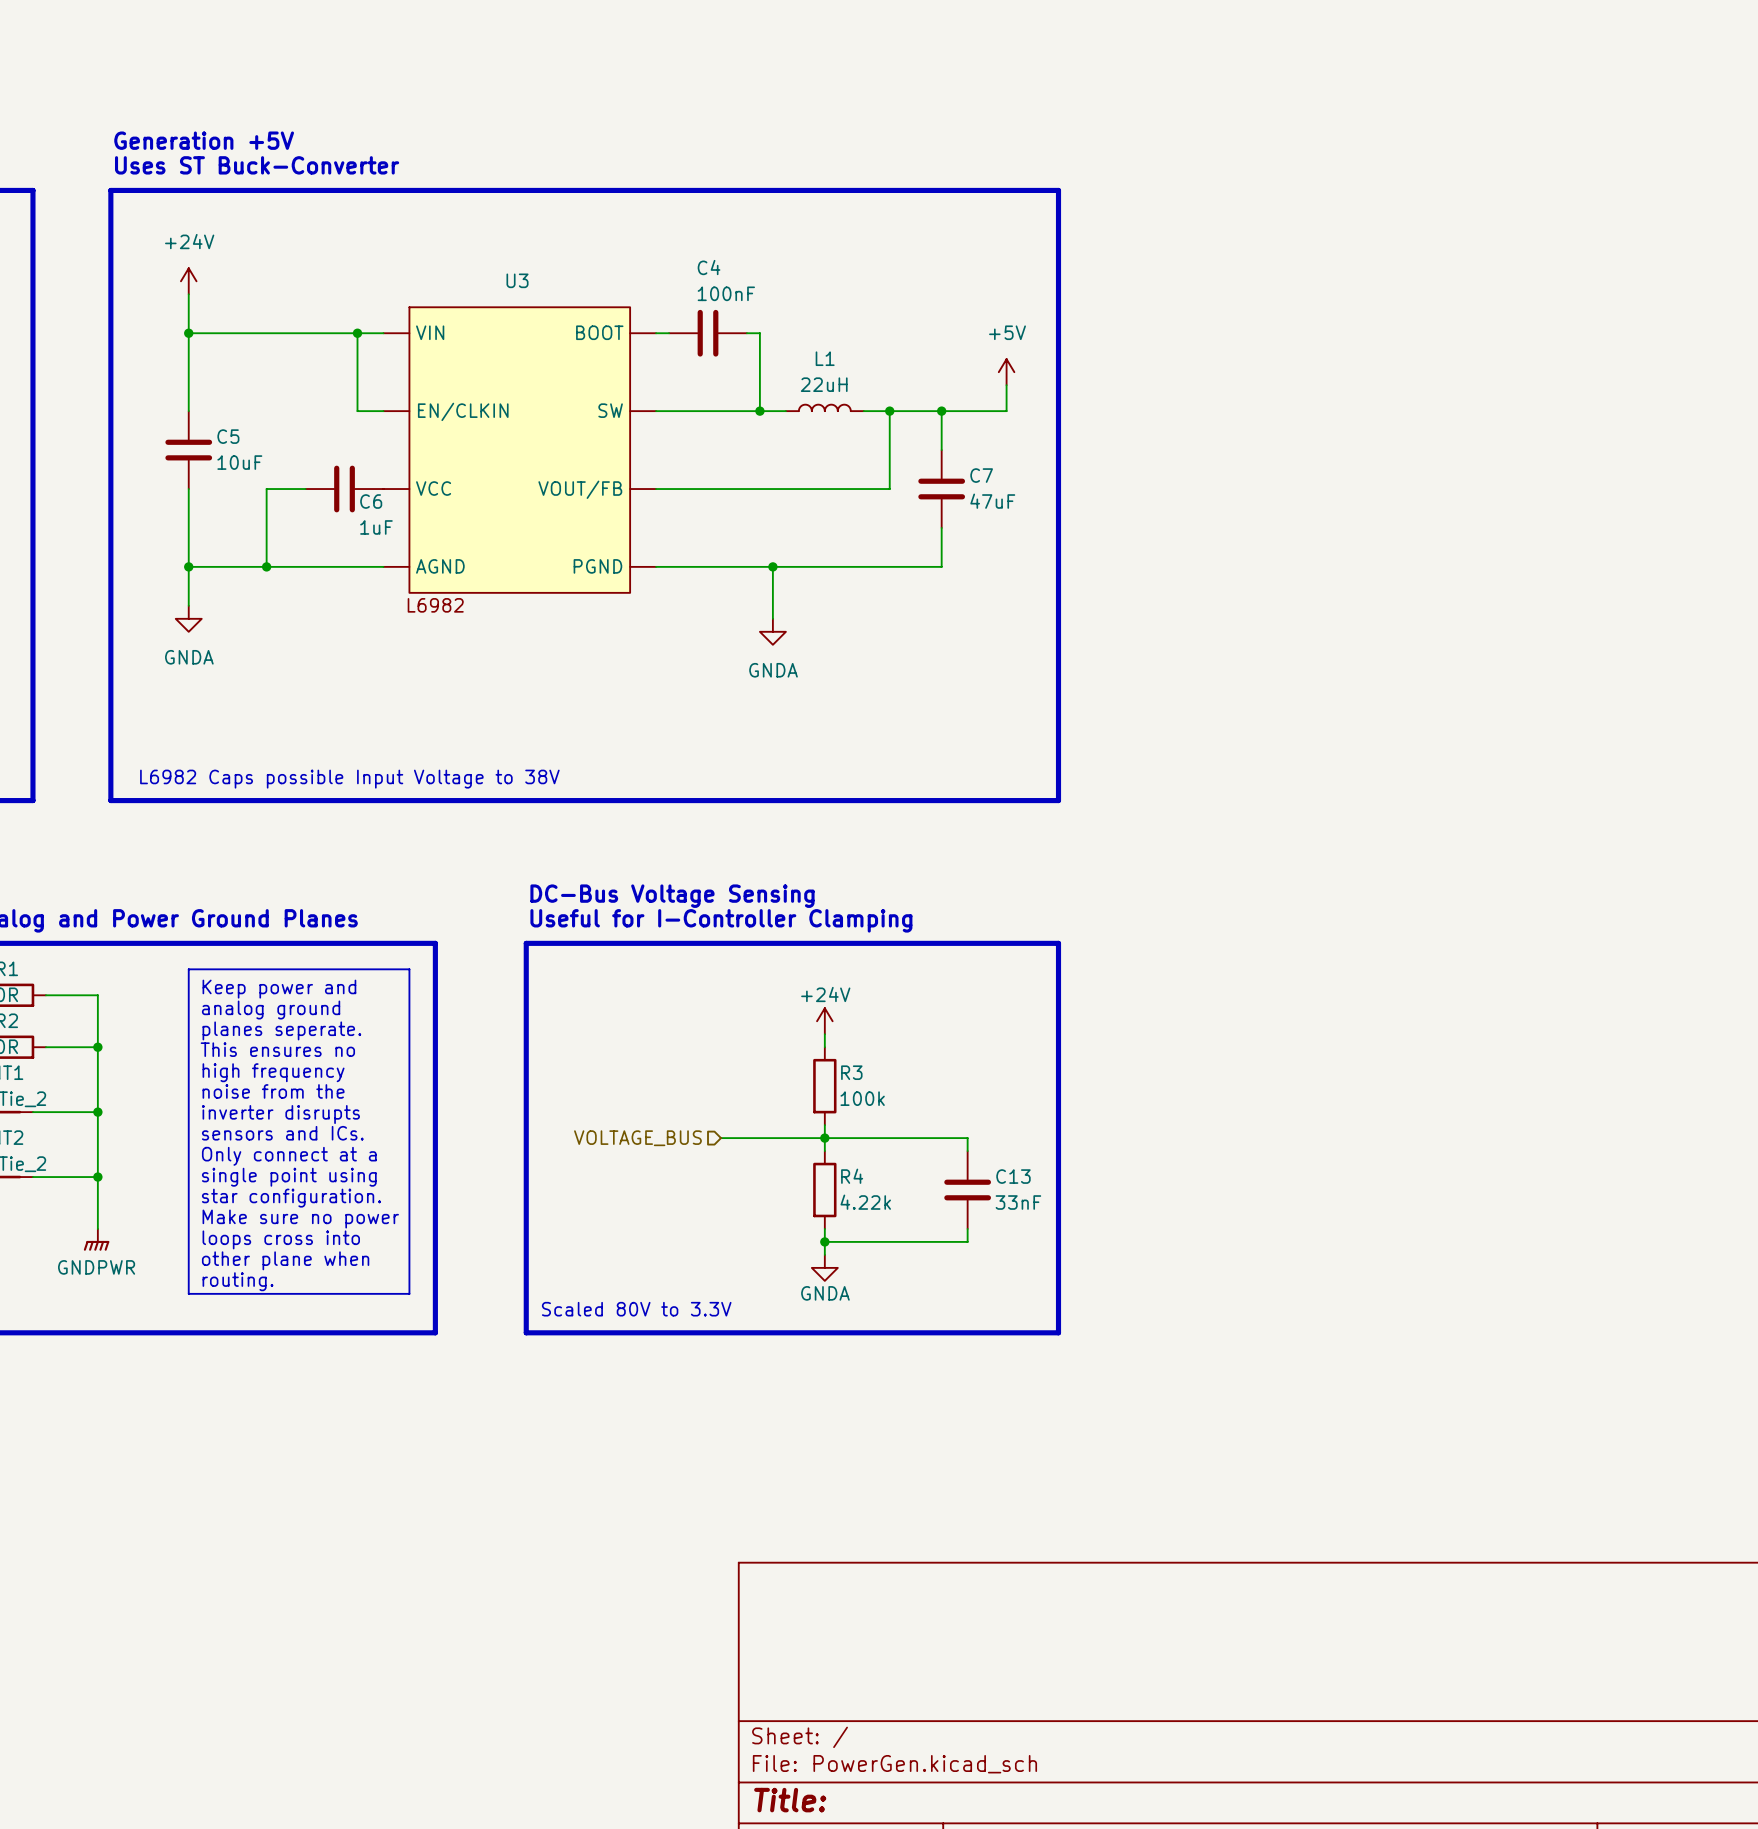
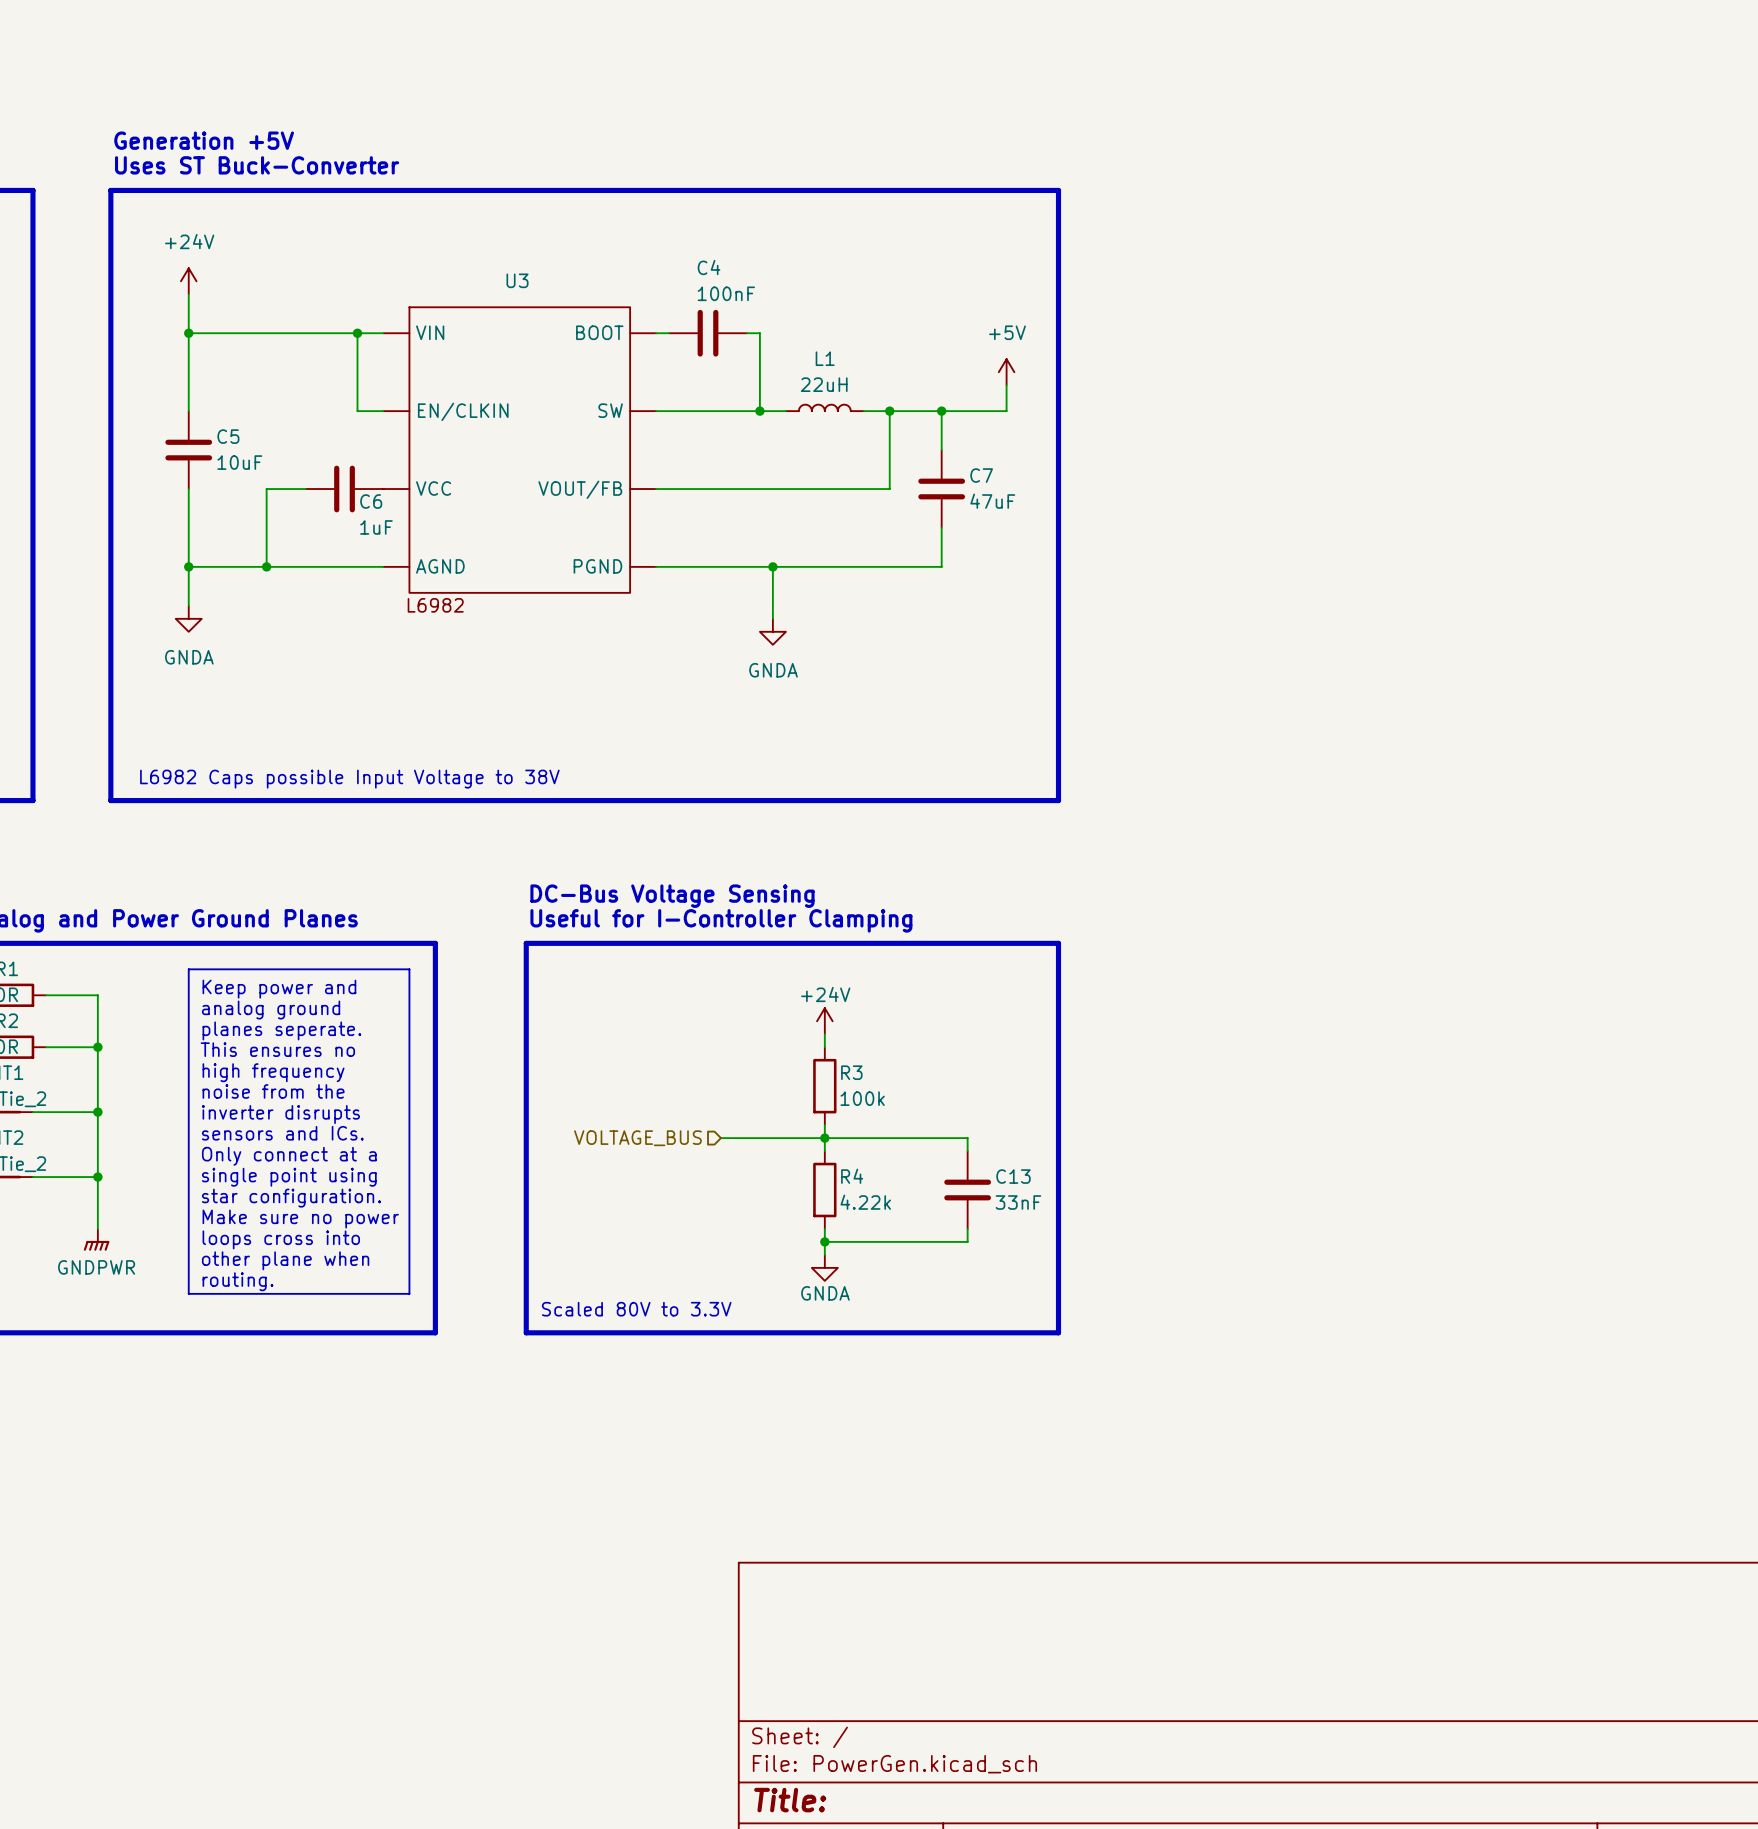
U3 symbol: [383, 307, 657, 593] -> [383, 307, 657, 593]

